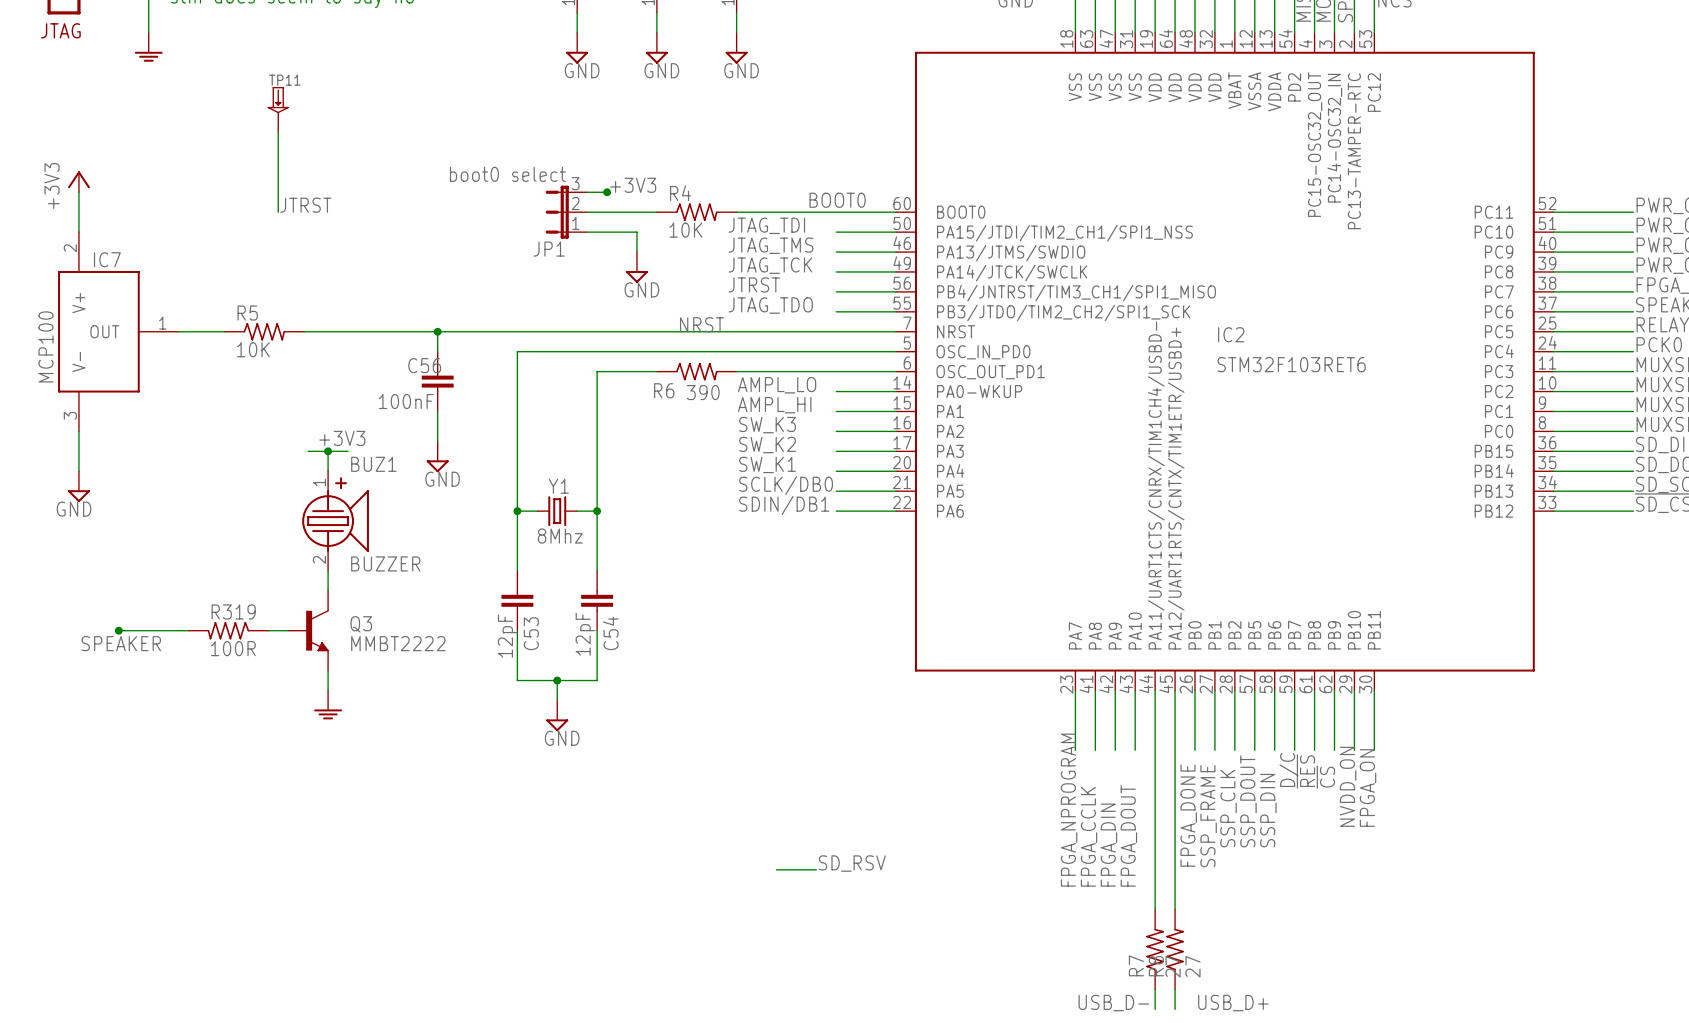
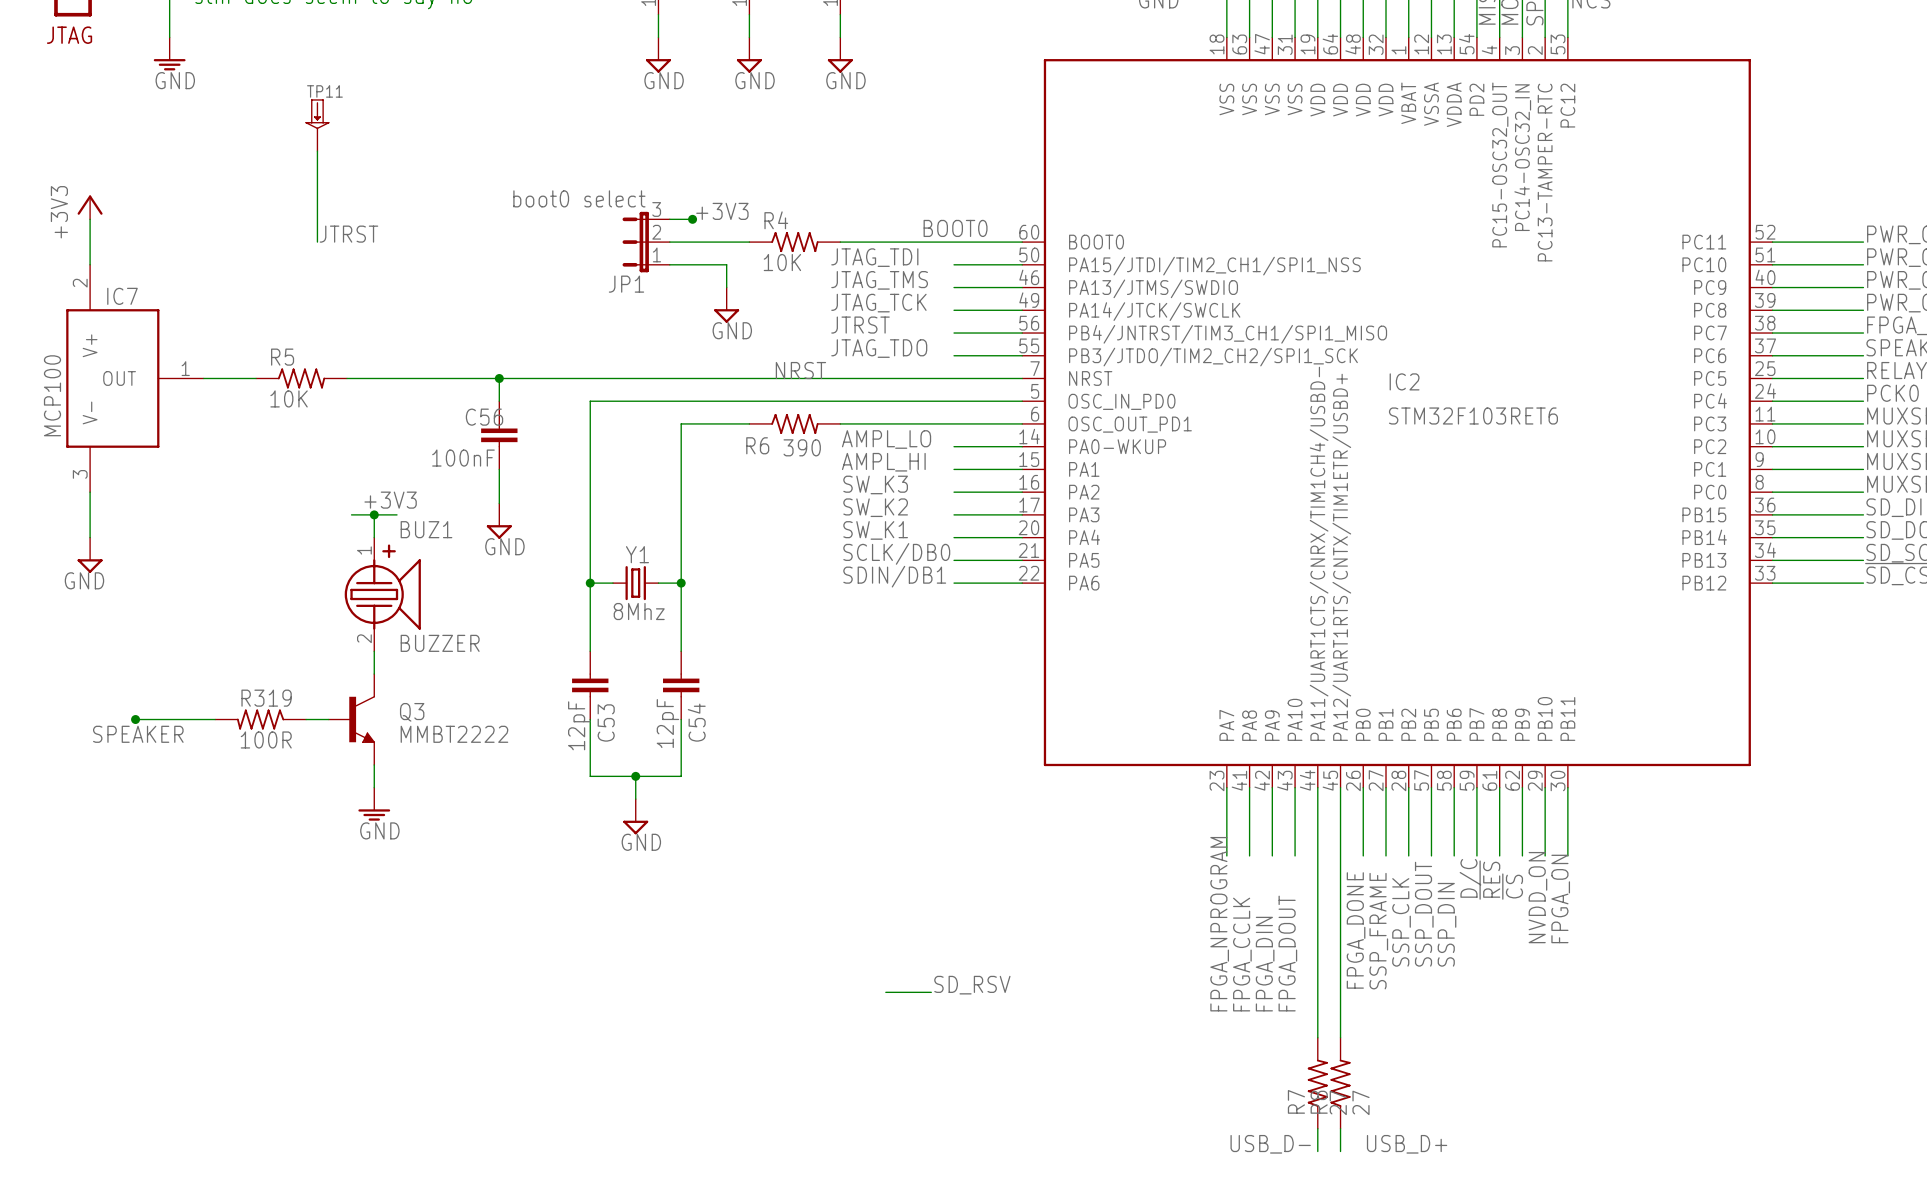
power symbol text: none -> GND (175, 80)
power symbol text: none -> GND (379, 830)

